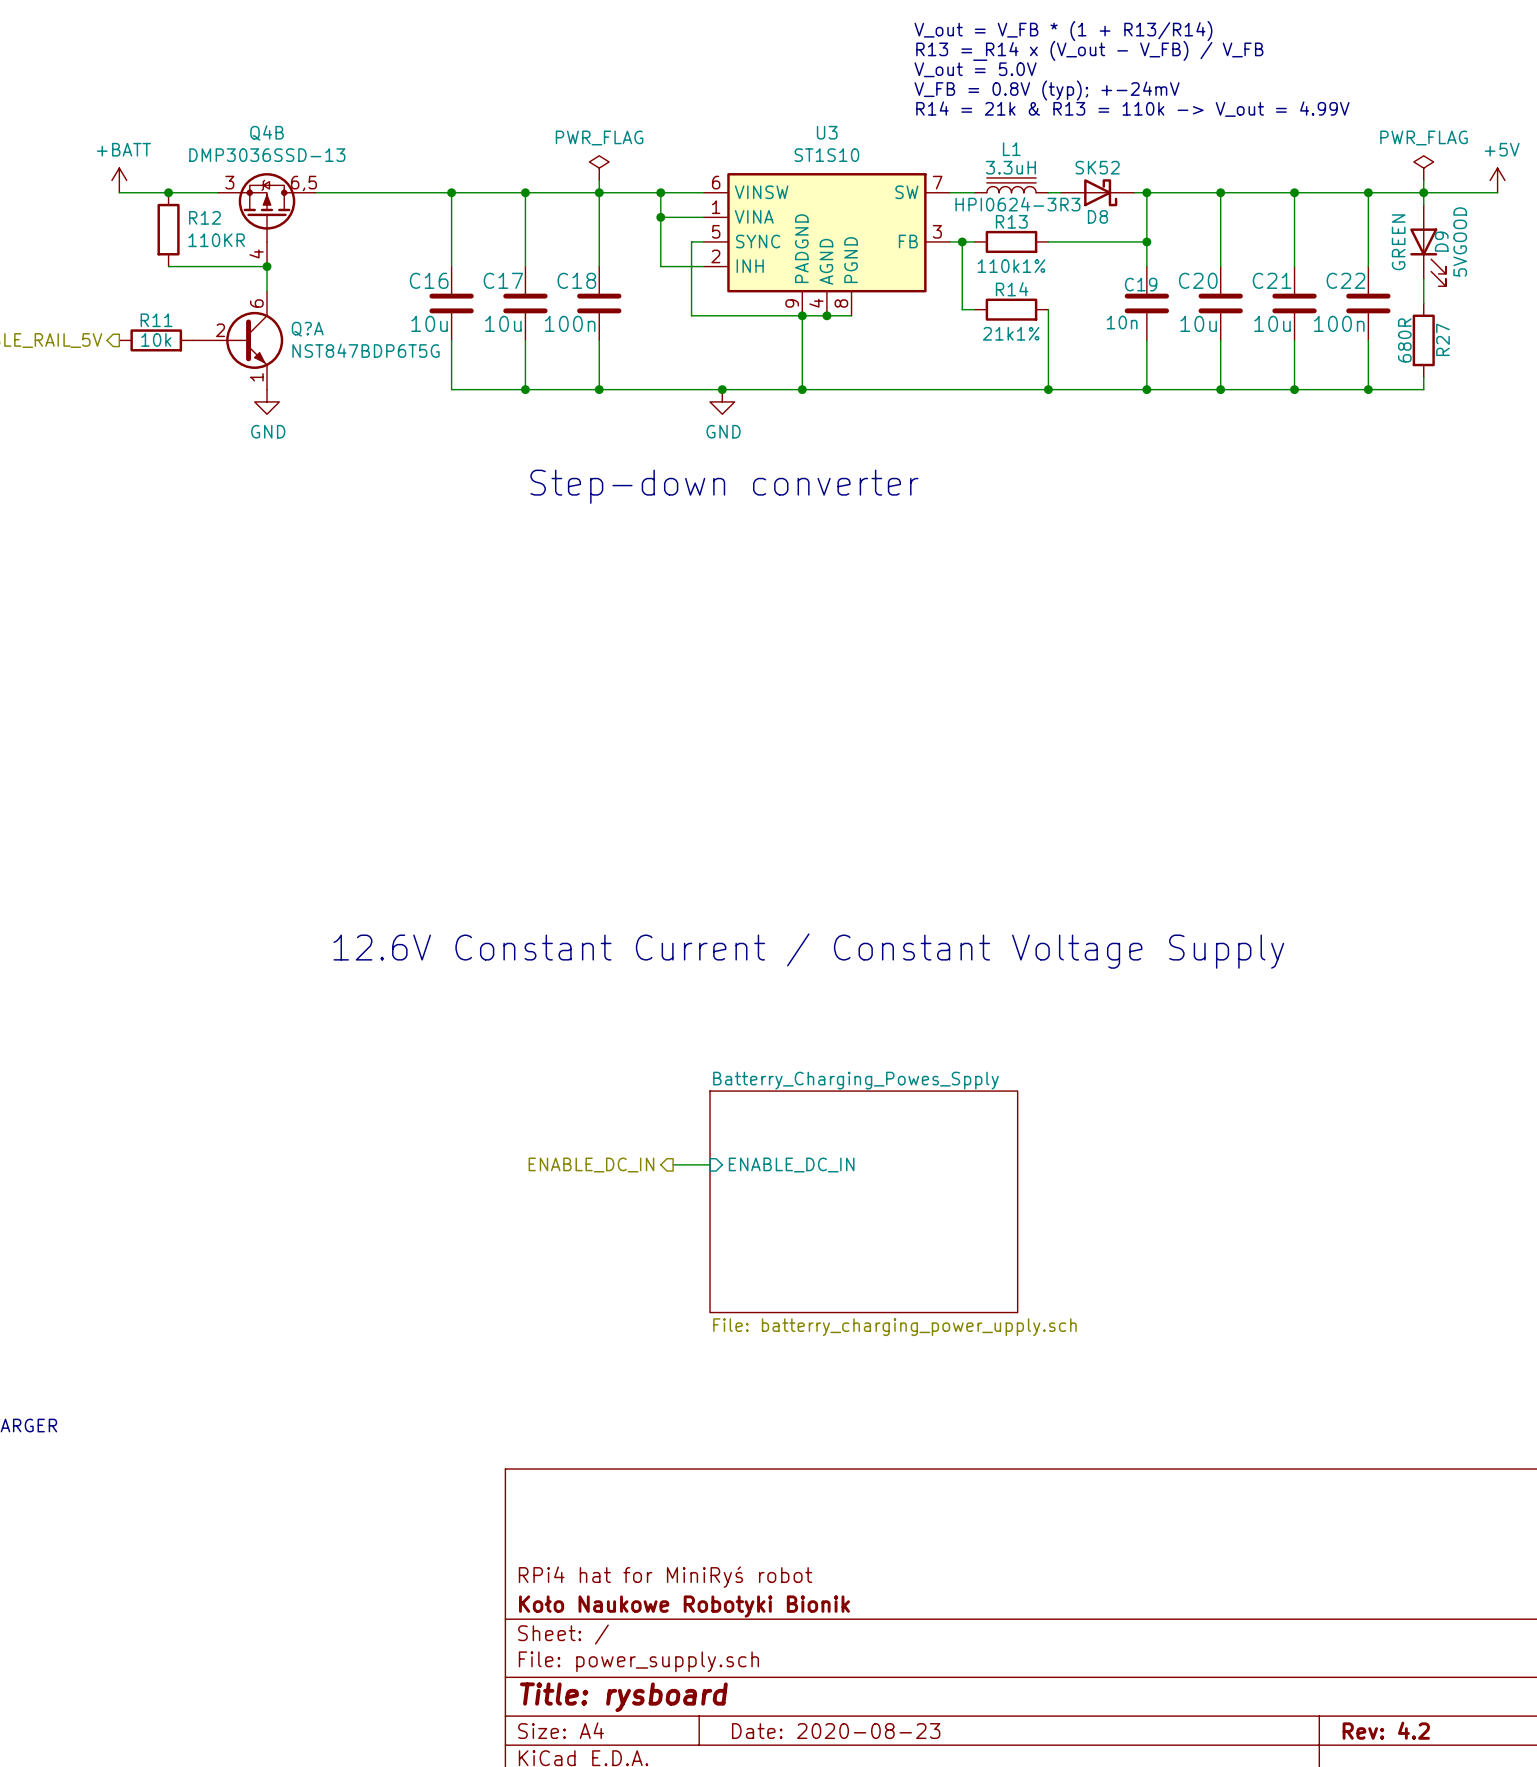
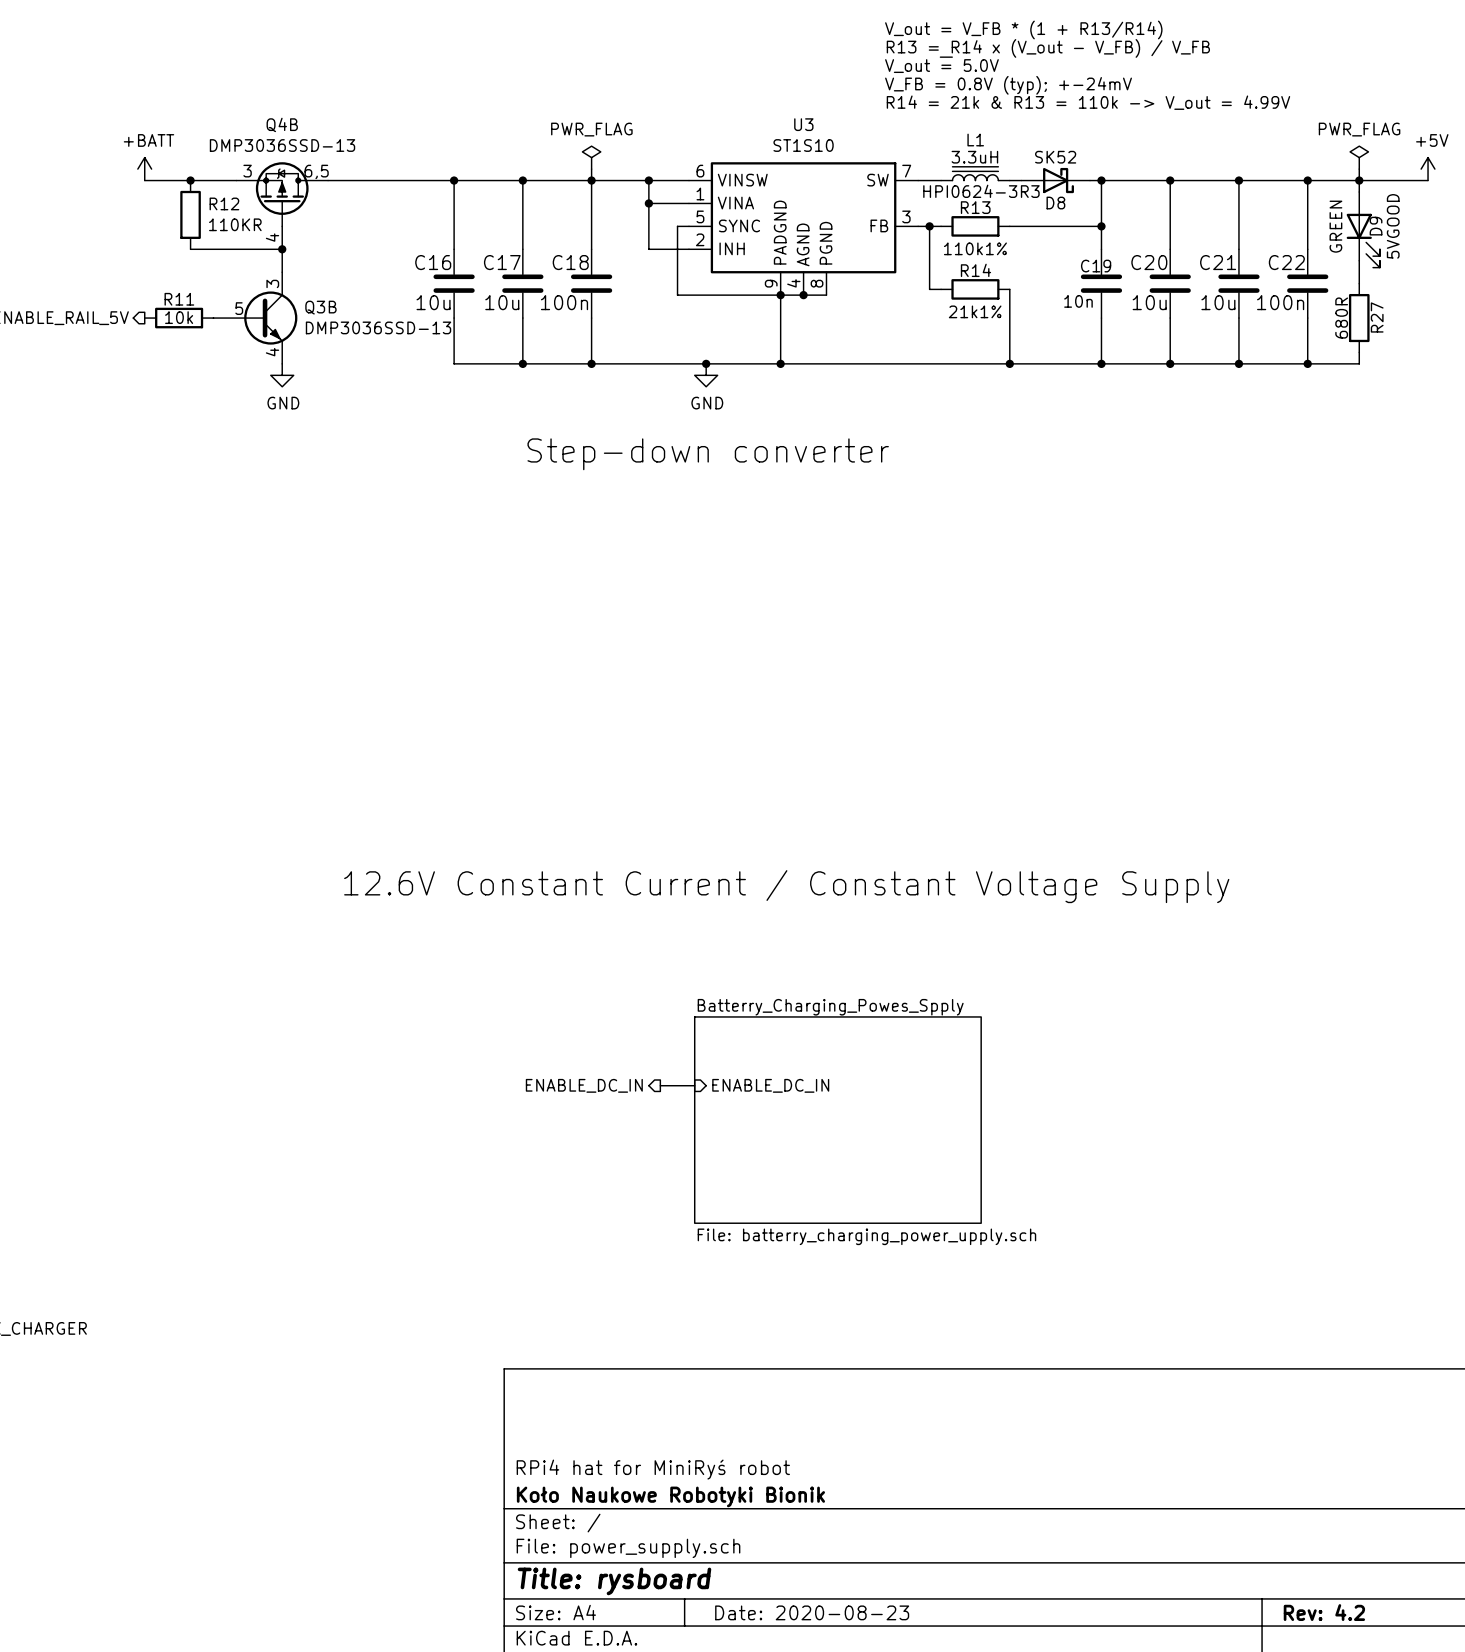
Q?A pin number: 6 (256, 303) -> 3 (272, 283)
Q?A name: Q?A (307, 329) -> Q3B (320, 307)
Q?A pin number: 2 (220, 330) -> 5 (239, 308)
Q?A value: NST847BDP6T5G (366, 350) -> DMP3036SSD-13 (378, 327)
Q?A pin number: 1 (256, 377) -> 4 (272, 352)

